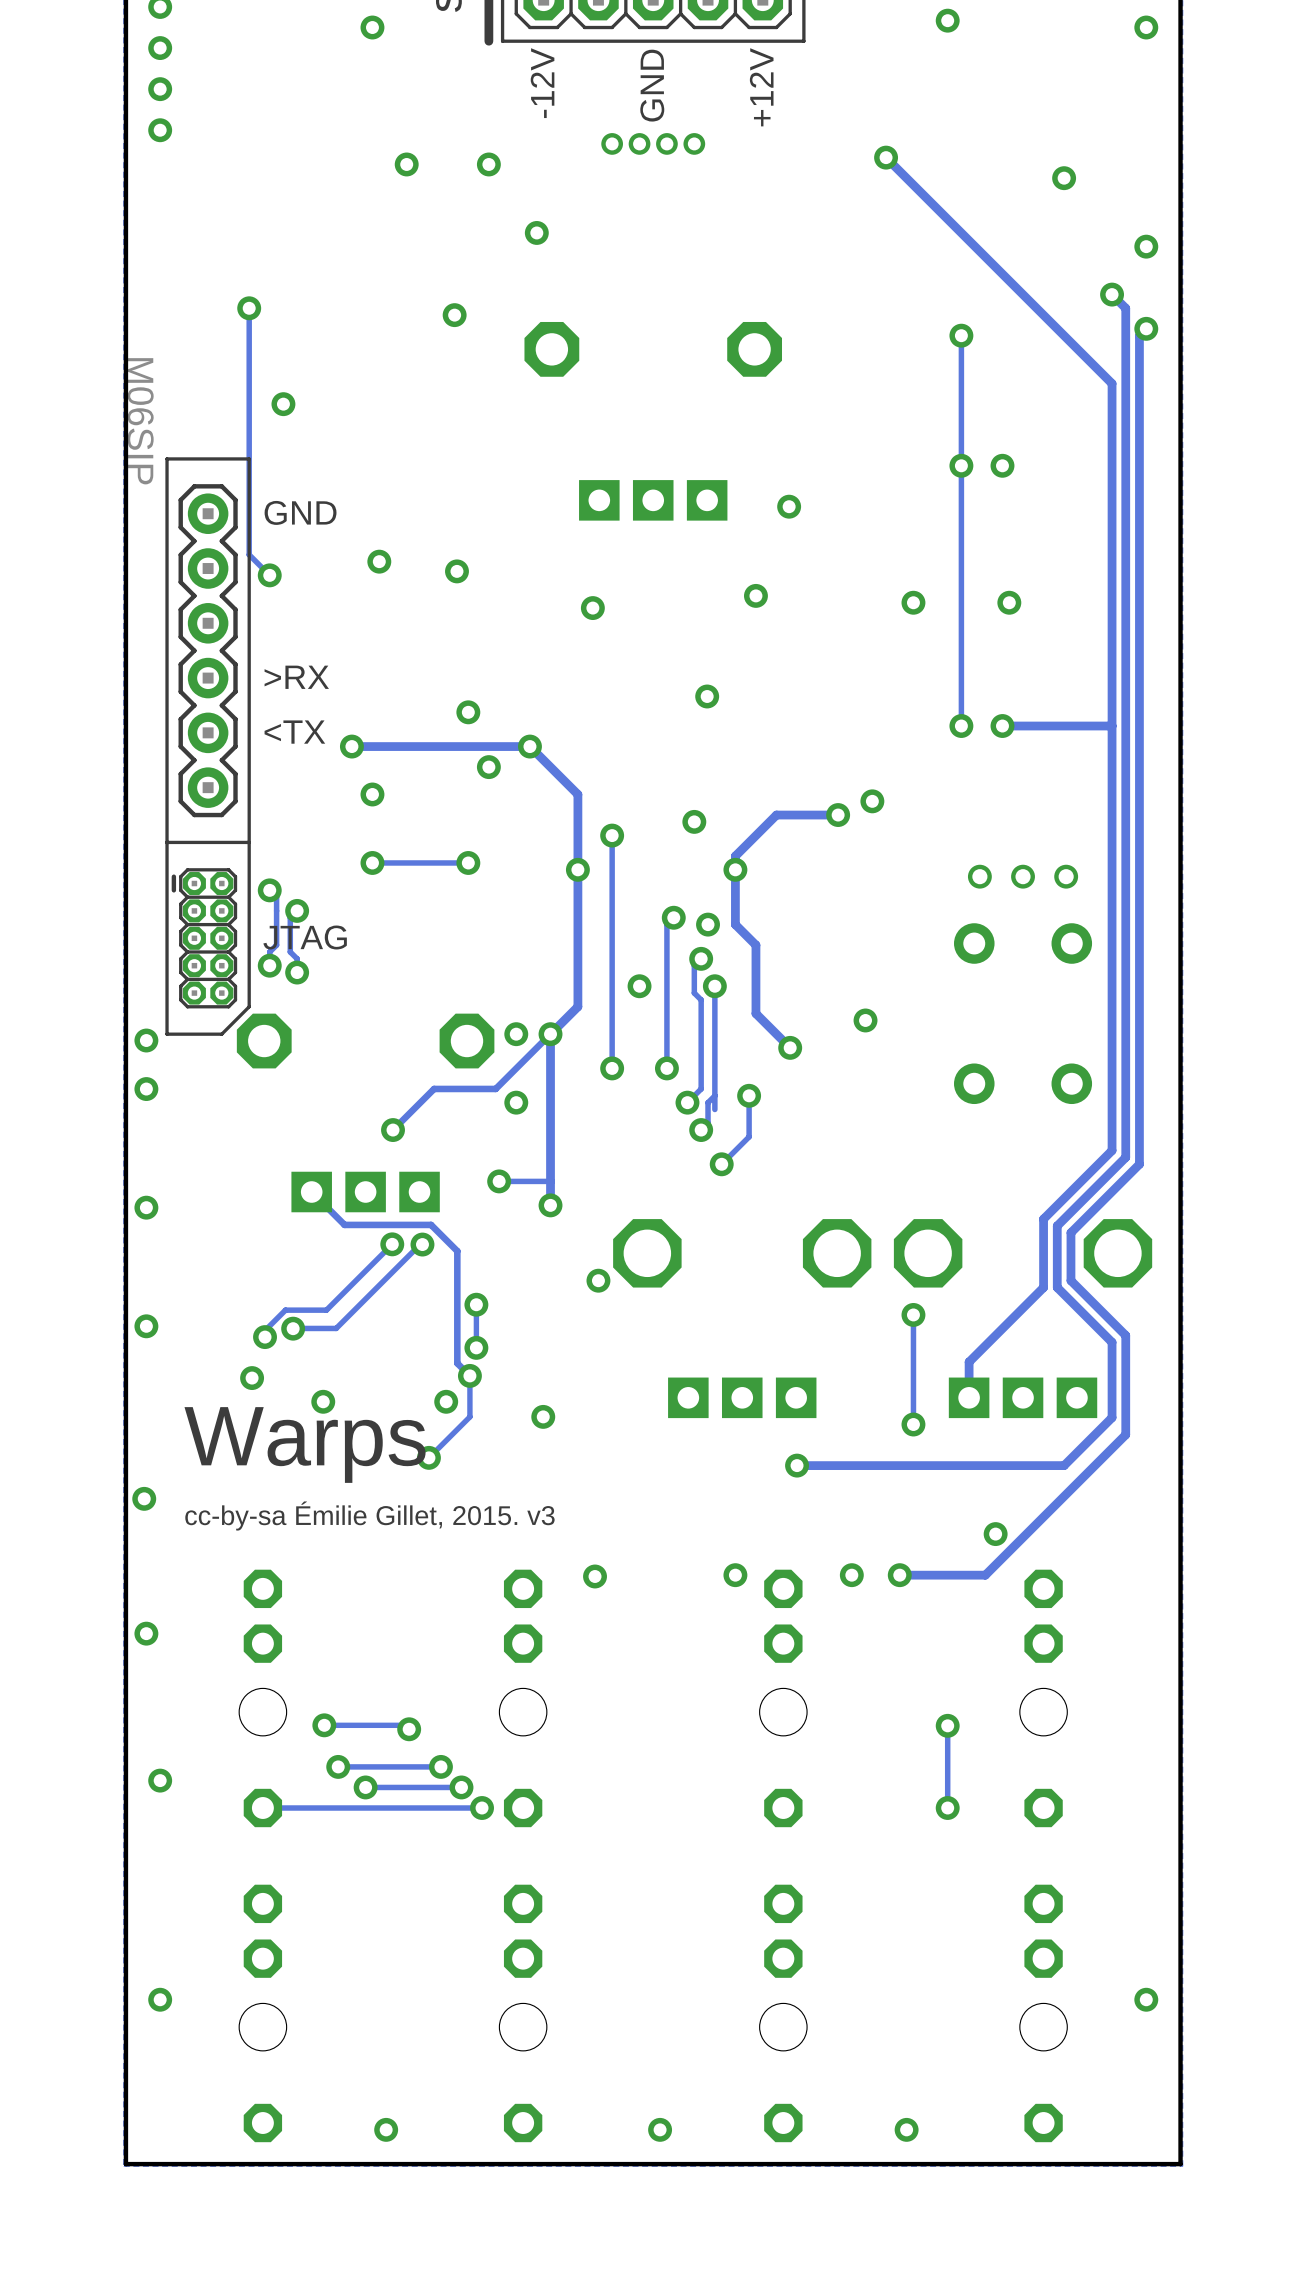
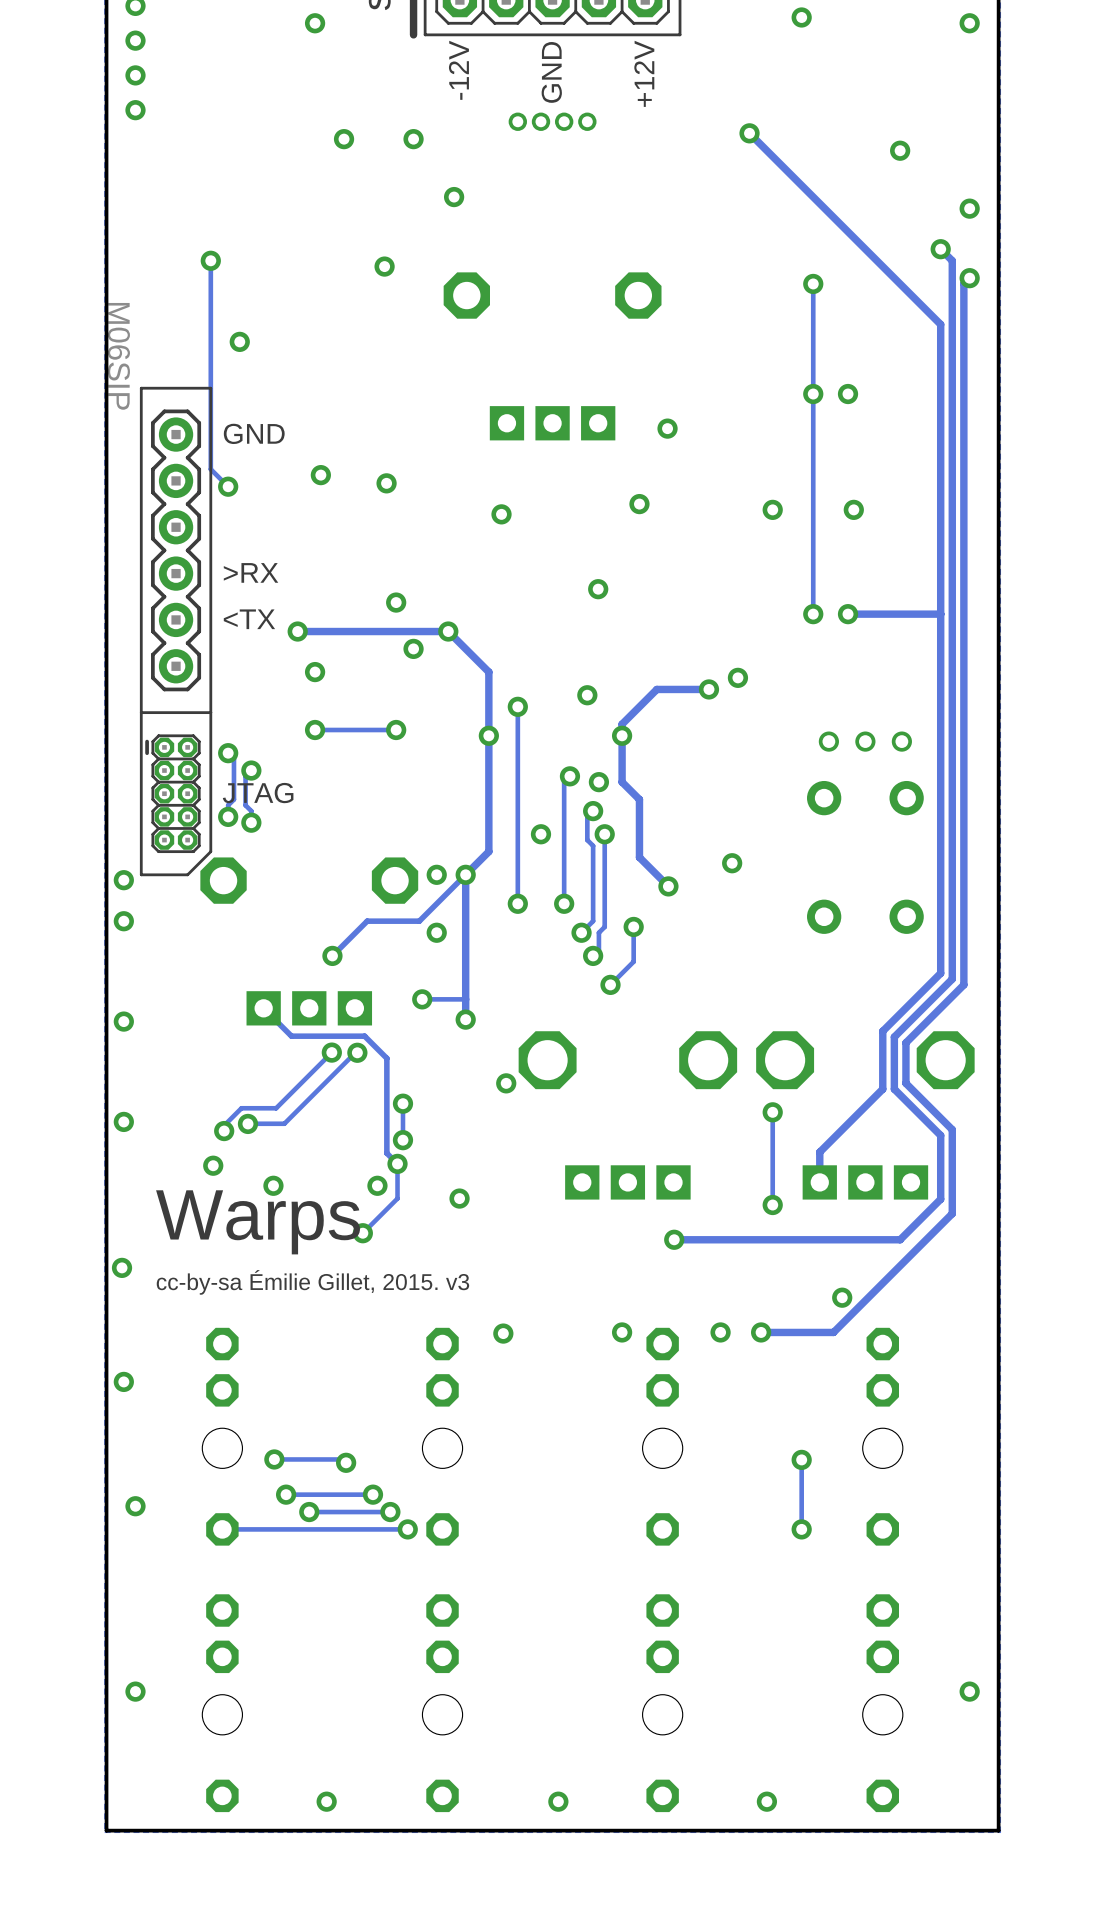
track: (714, 1095) (714, 1109) -> none

